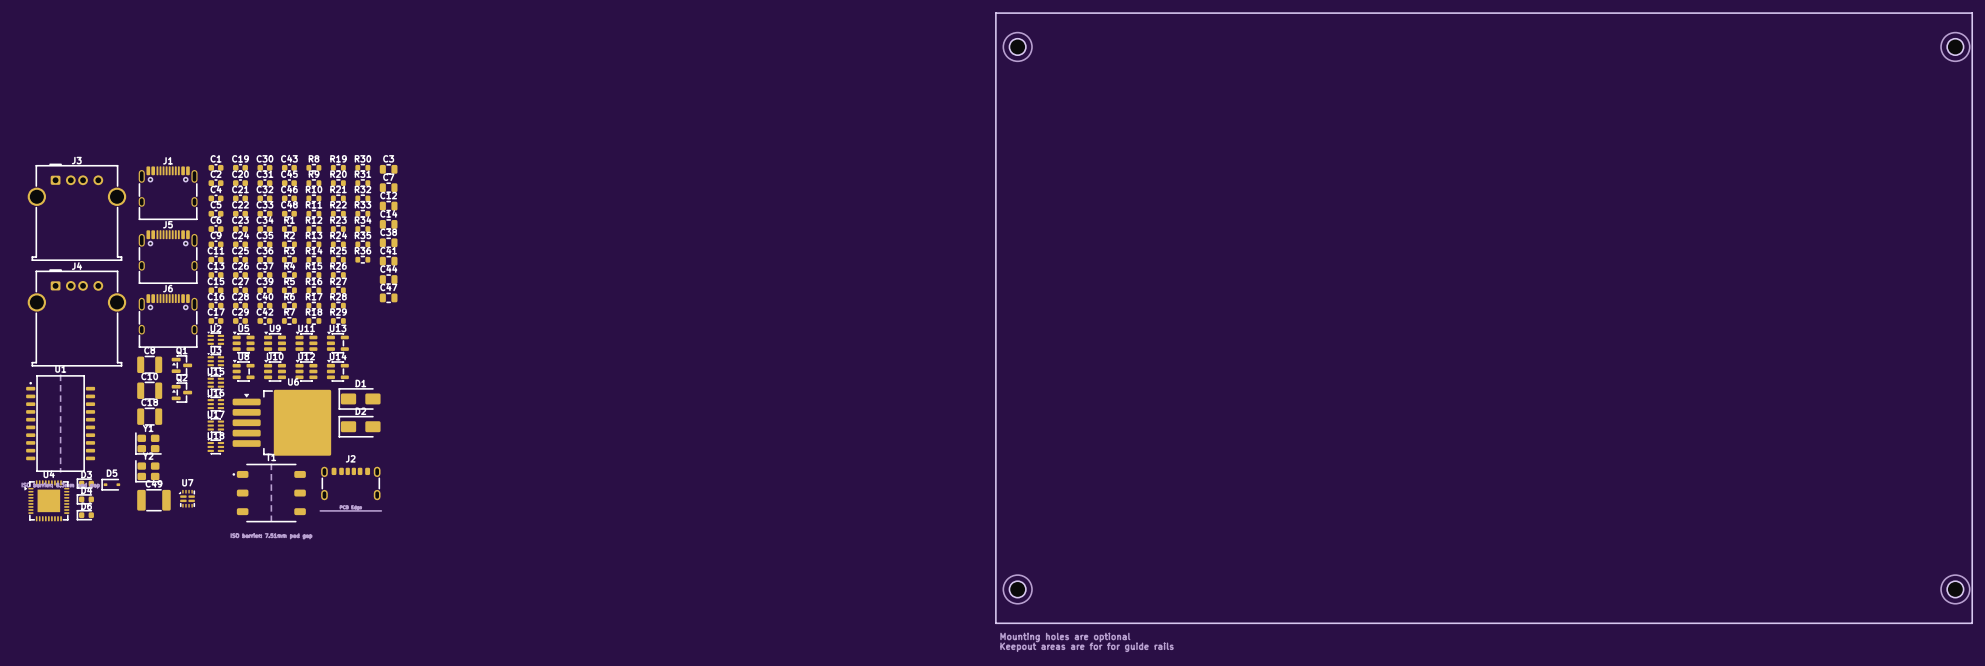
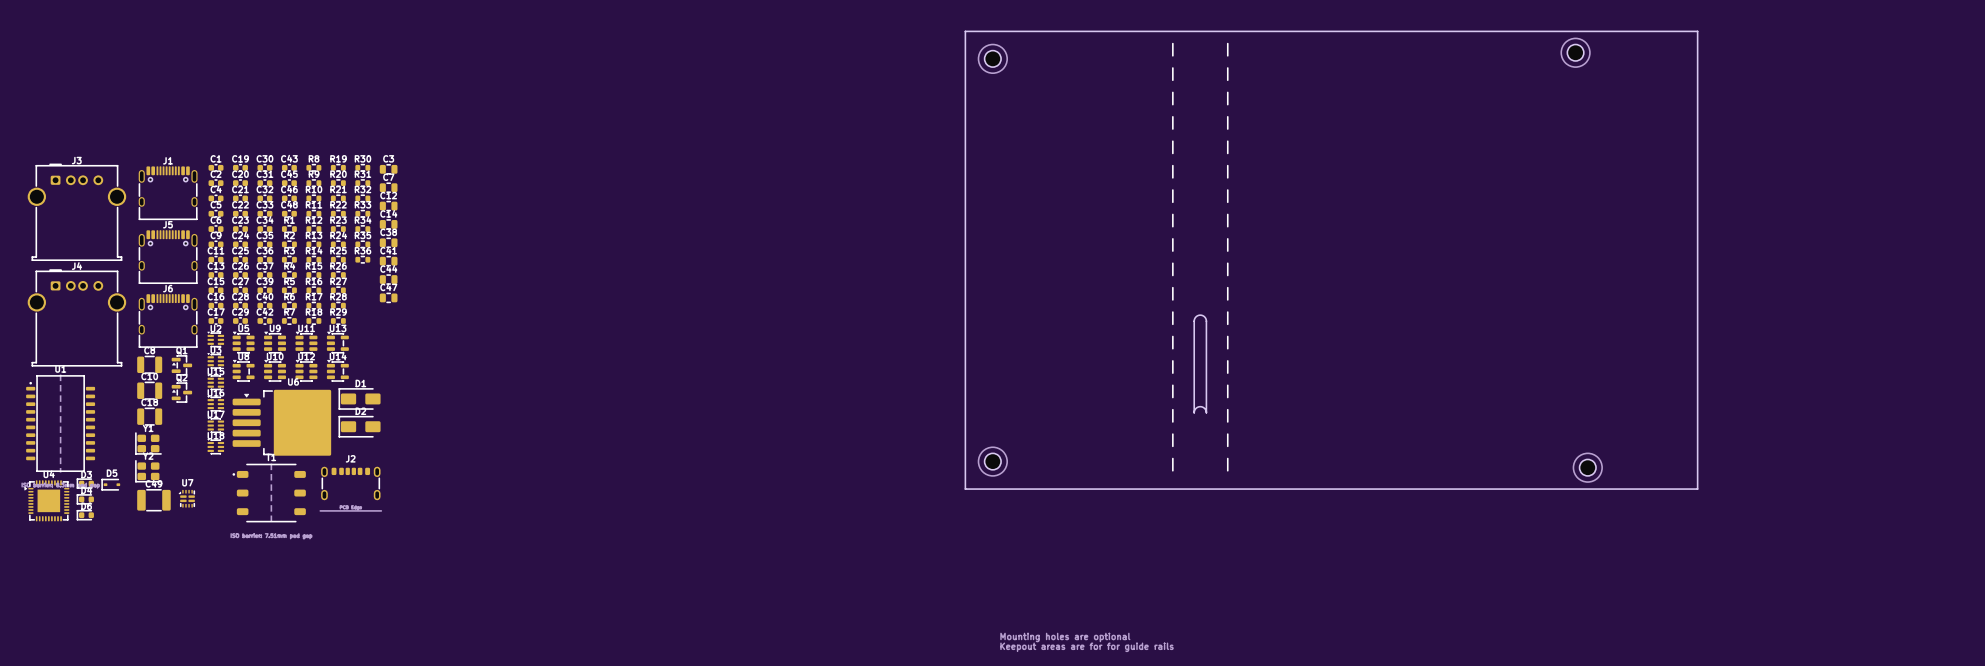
board edge: (995, 13) (1972, 13) (1972, 623) (995, 623) (995, 13) -> (965, 31) (965, 489) (1697, 489) (1697, 31) (965, 31)
line: none -> (1172, 43) (1172, 55)
line: none -> (1227, 43) (1227, 55)
part position: (1017, 46) -> (992, 58)
part: (1955, 46) -> none
part: none -> (1575, 52)
line: none -> (1172, 68) (1172, 80)
line: none -> (1227, 68) (1227, 80)
line: none -> (1172, 92) (1172, 104)
line: none -> (1227, 92) (1227, 104)
line: none -> (1172, 116) (1172, 129)
line: none -> (1227, 116) (1227, 129)
line: none -> (1172, 141) (1172, 153)
line: none -> (1227, 141) (1227, 153)
line: none -> (1172, 165) (1172, 177)
line: none -> (1227, 165) (1227, 177)
line: none -> (1172, 190) (1172, 202)
line: none -> (1227, 190) (1227, 202)
line: none -> (1172, 214) (1172, 226)
line: none -> (1227, 214) (1227, 226)
line: none -> (1172, 238) (1172, 251)
line: none -> (1227, 238) (1227, 251)
line: none -> (1172, 263) (1172, 275)
line: none -> (1227, 263) (1227, 275)
line: none -> (1172, 287) (1172, 299)
line: none -> (1227, 287) (1227, 299)
line: none -> (1172, 312) (1172, 324)
line: none -> (1227, 312) (1227, 324)
board edge: none -> (1194, 321) (1194, 412) (1195, 408) (1200, 406) (1204, 408) (1206, 412) (1206, 320) (1204, 316) (1200, 315) (1195, 316) (1194, 321)
line: none -> (1172, 336) (1172, 348)
line: none -> (1227, 336) (1227, 348)
line: none -> (1172, 360) (1172, 373)
line: none -> (1227, 360) (1227, 373)
line: none -> (1172, 385) (1172, 397)
line: none -> (1227, 385) (1227, 397)
line: none -> (1172, 409) (1172, 421)
line: none -> (1227, 409) (1227, 421)
line: none -> (1172, 434) (1172, 446)
line: none -> (1227, 434) (1227, 446)
line: none -> (1172, 458) (1172, 470)
line: none -> (1227, 458) (1227, 470)
part: none -> (1587, 467)
part position: (1017, 589) -> (992, 461)
part: (1955, 589) -> none

